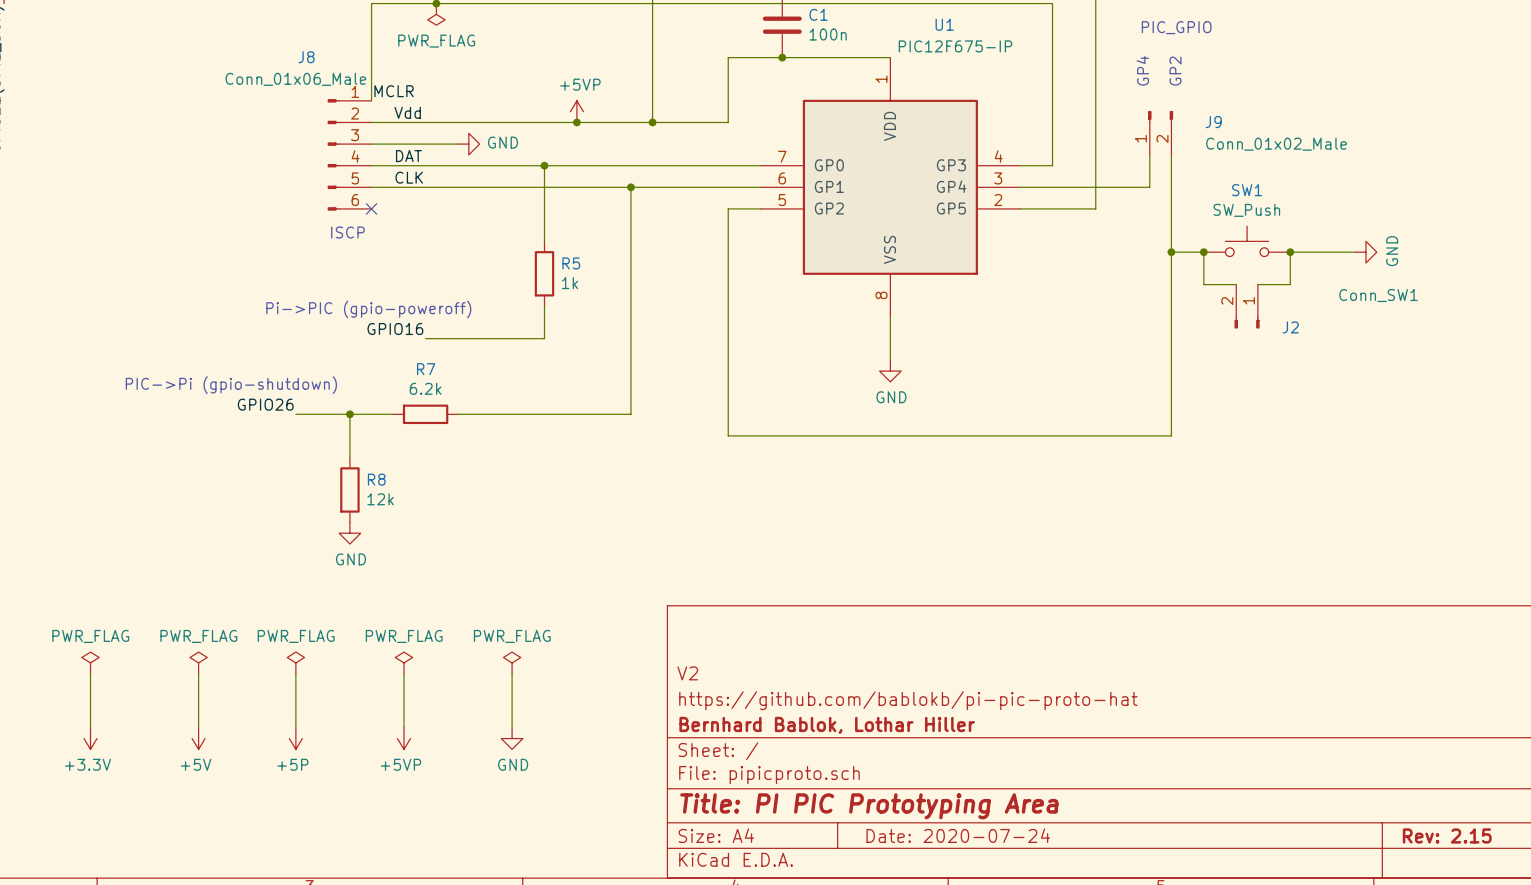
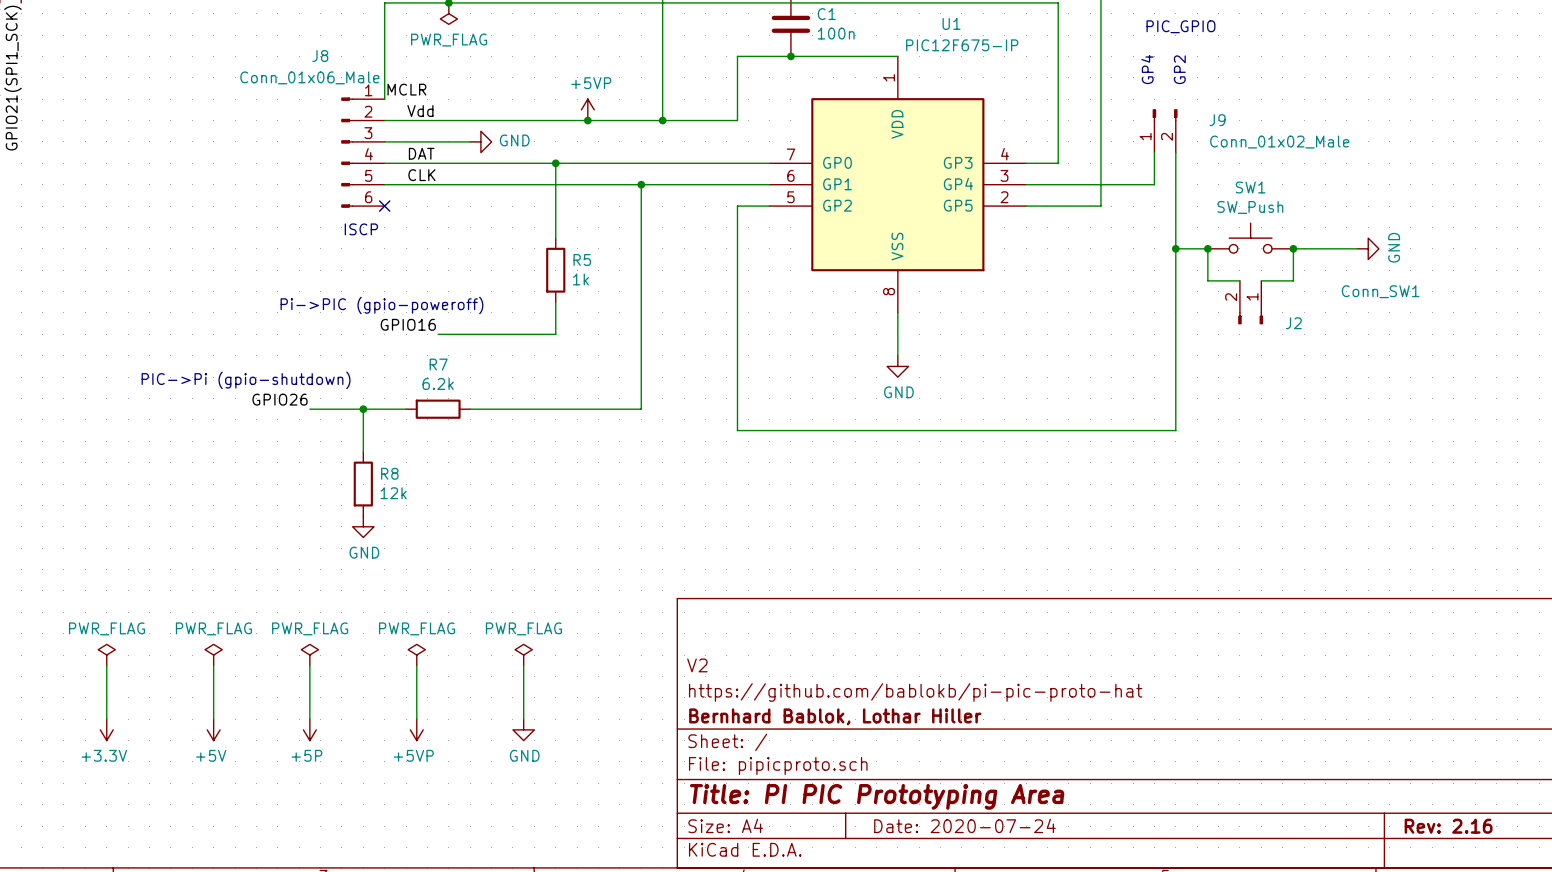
title block: Rev: 2.15 (1447, 835) -> Rev: 2.16 (1448, 826)

